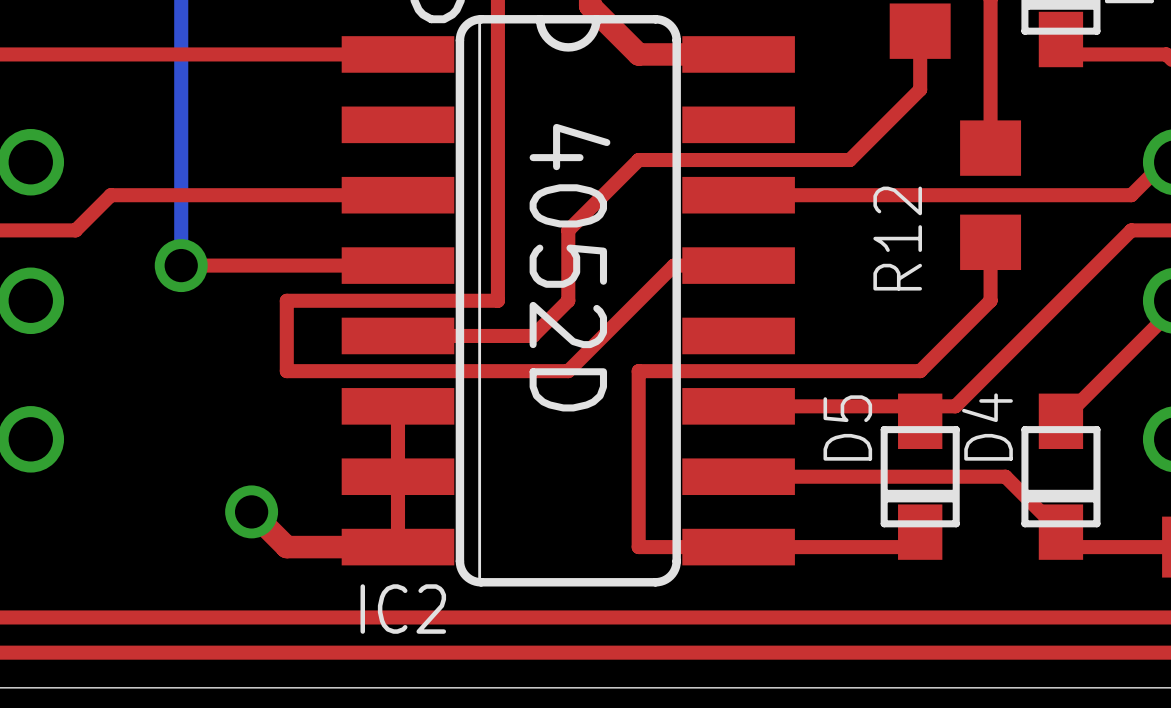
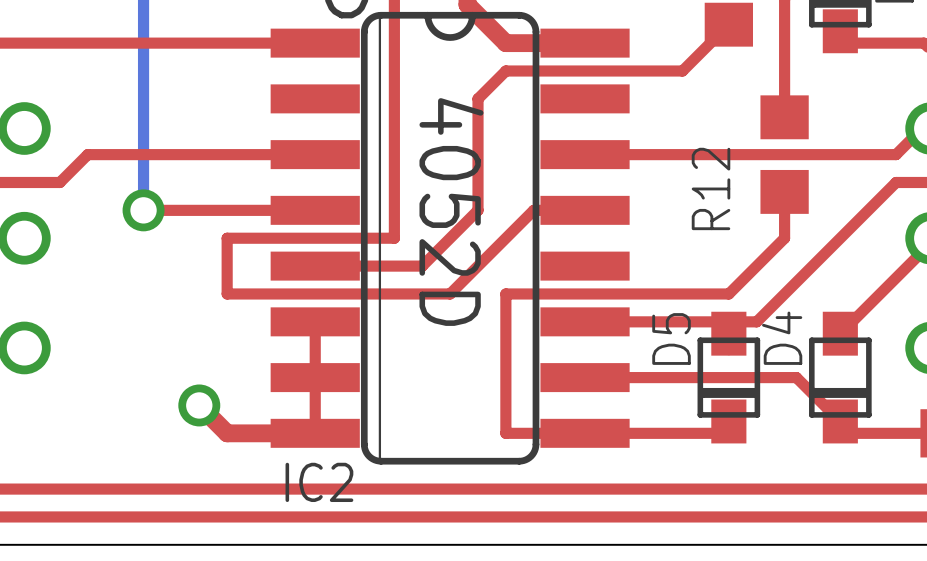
top track: (920, 31) (920, 89) (849, 160) (638, 160) (568, 230) (568, 300) -> (728, 24) (682, 71) (505, 71) (478, 98) (478, 210) (450, 238)

